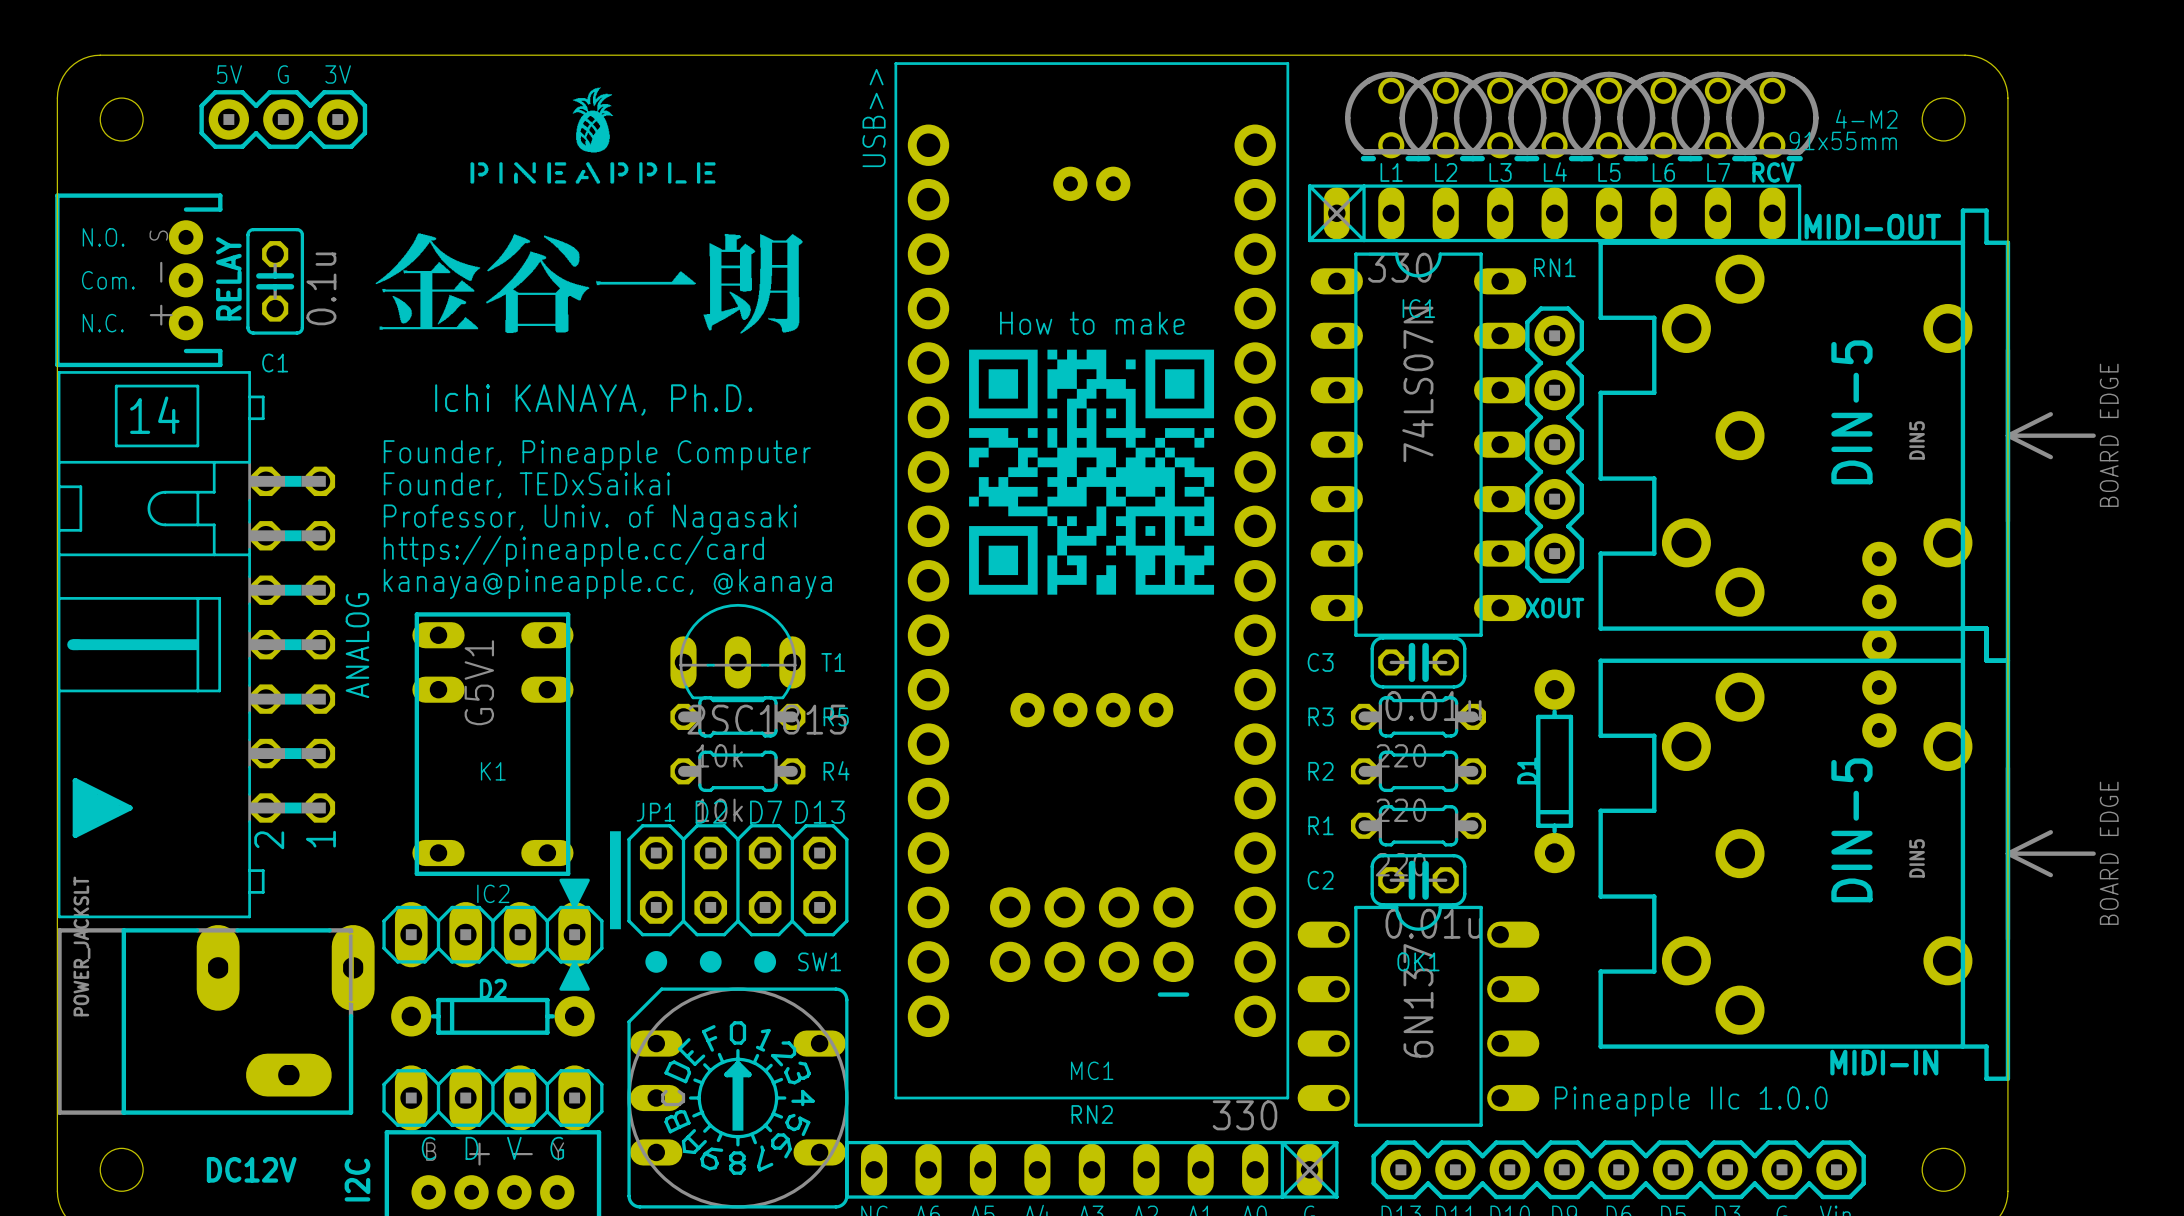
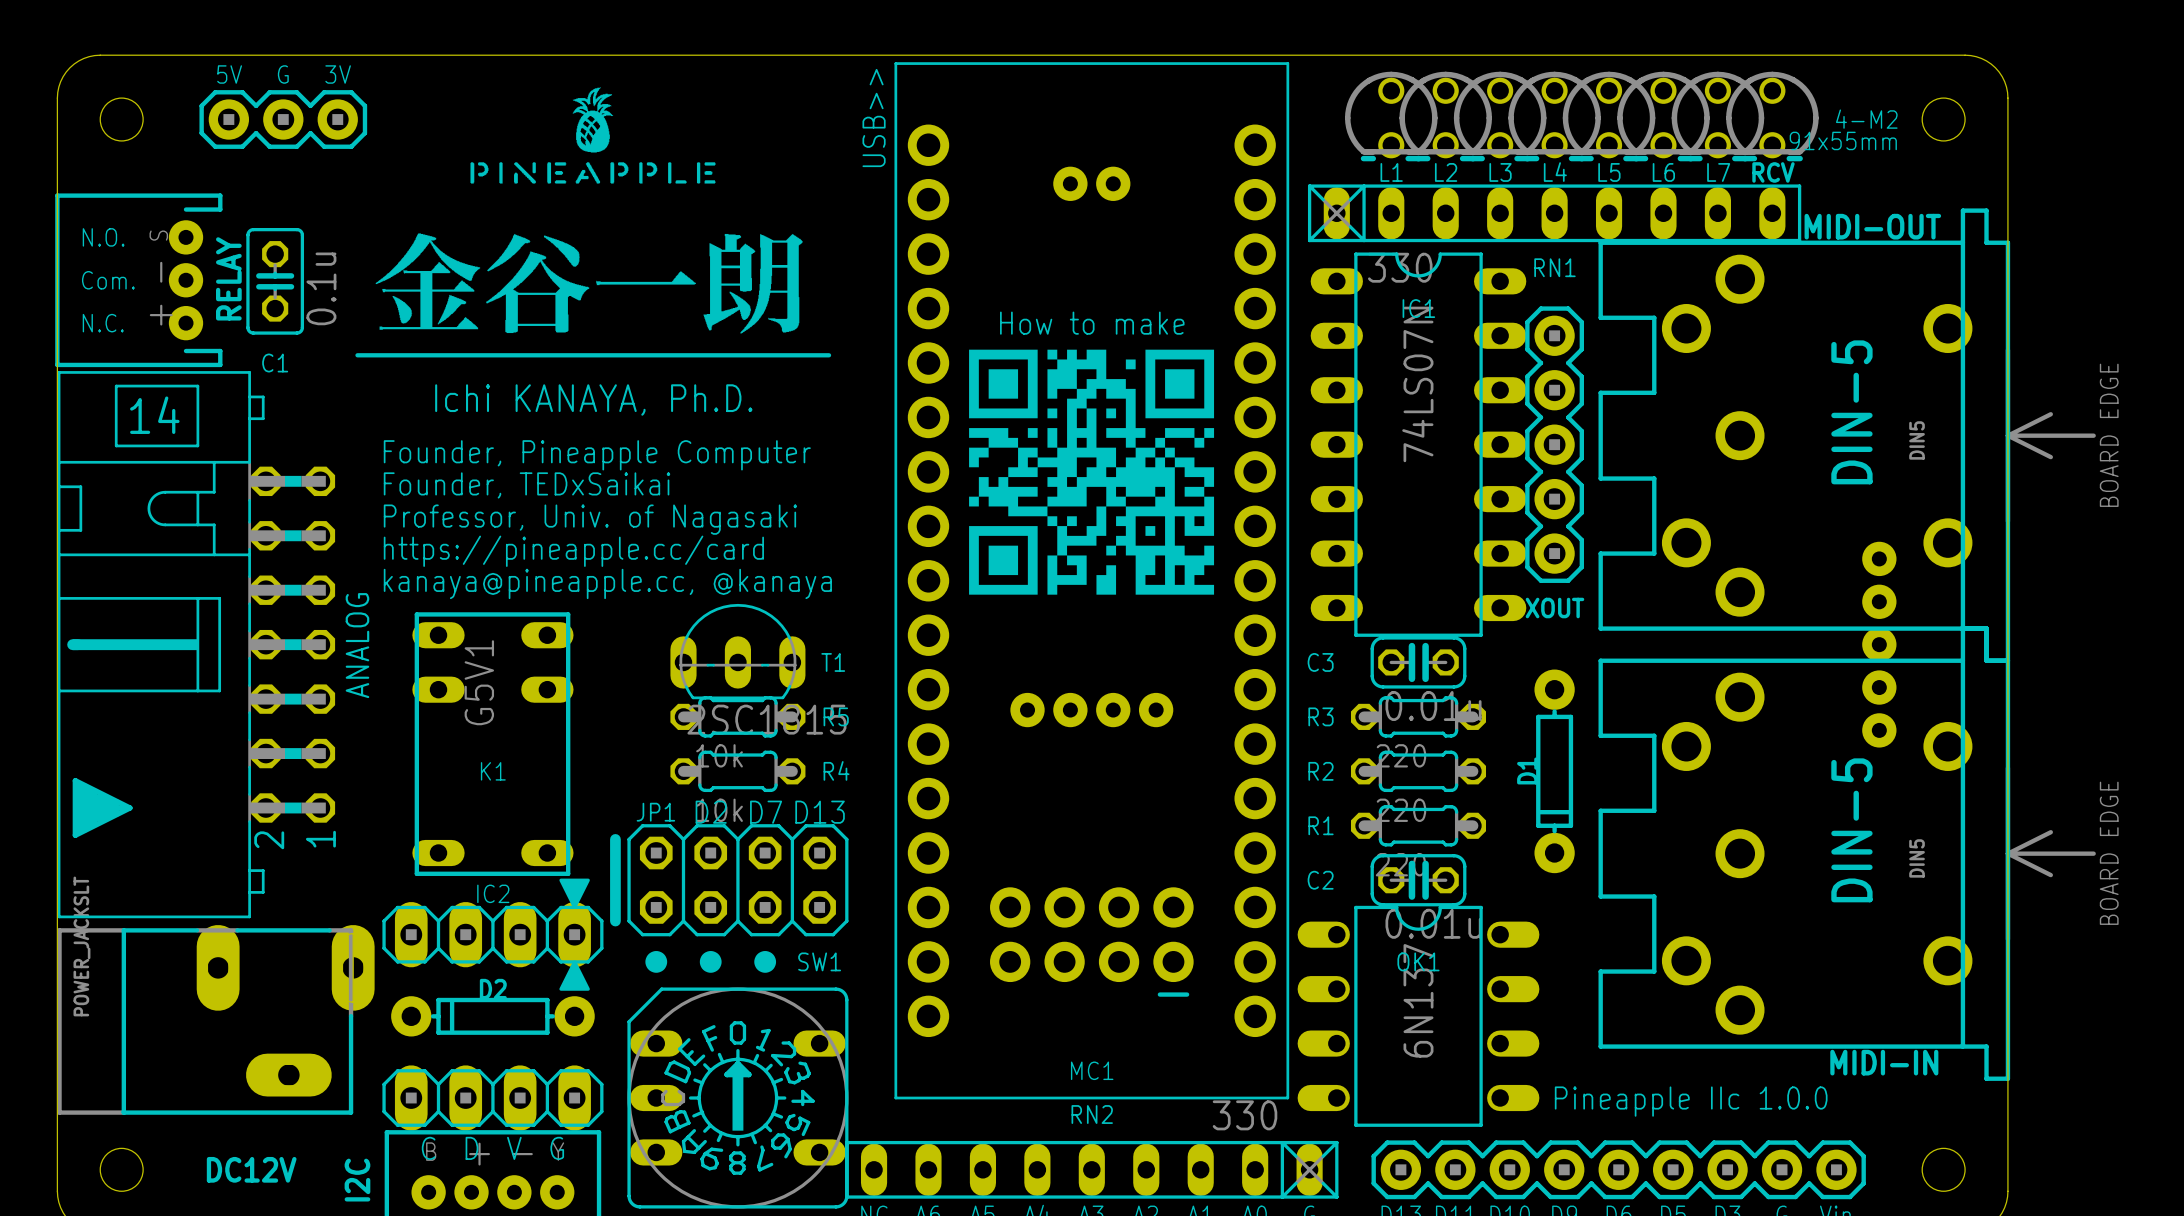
line: none -> (357, 355) (829, 355)
drawing: [609, 831, 621, 930] -> none
line: none -> (615, 839) (615, 921)

